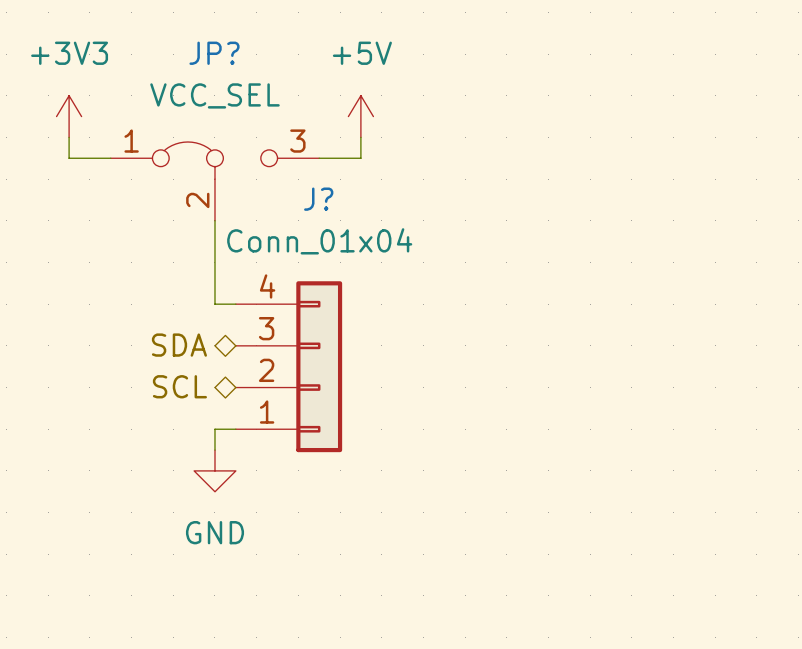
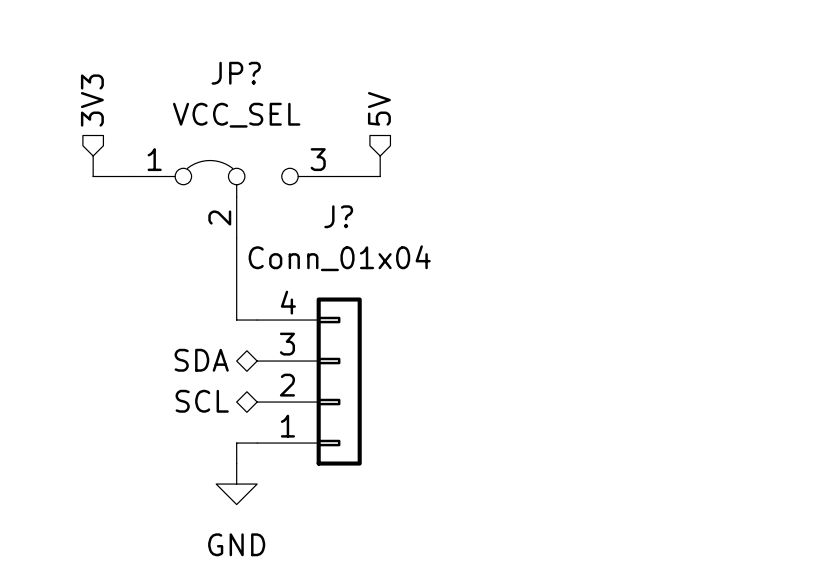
hierarchical label: none -> 3V3 (92, 100)
hierarchical label: none -> 5V (379, 108)
power symbol: +3V3 (69, 116) -> none
power symbol: +5V (360, 116) -> none

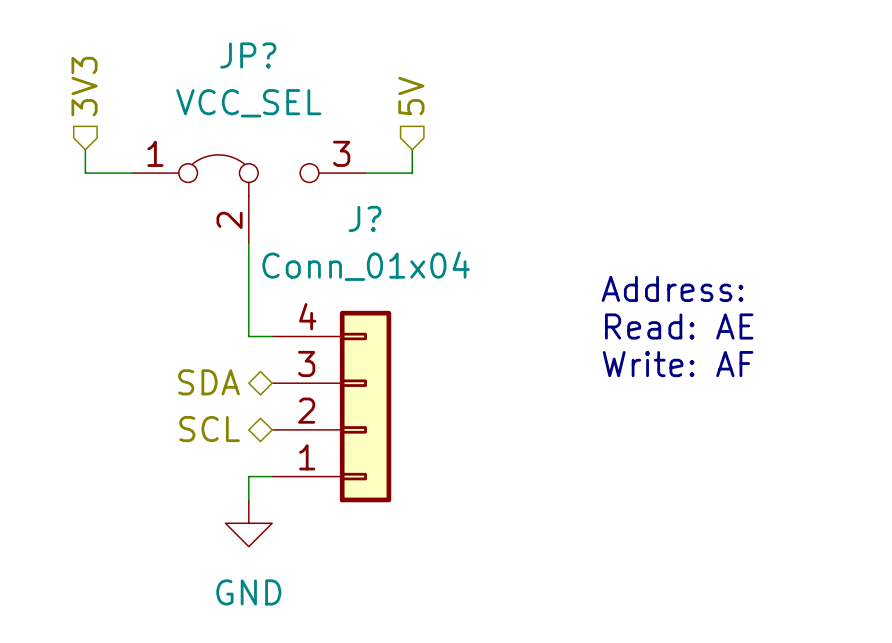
text: none -> Address: (672, 288)
text: none -> Read: AE (679, 326)
text: none -> Write: AF (678, 364)

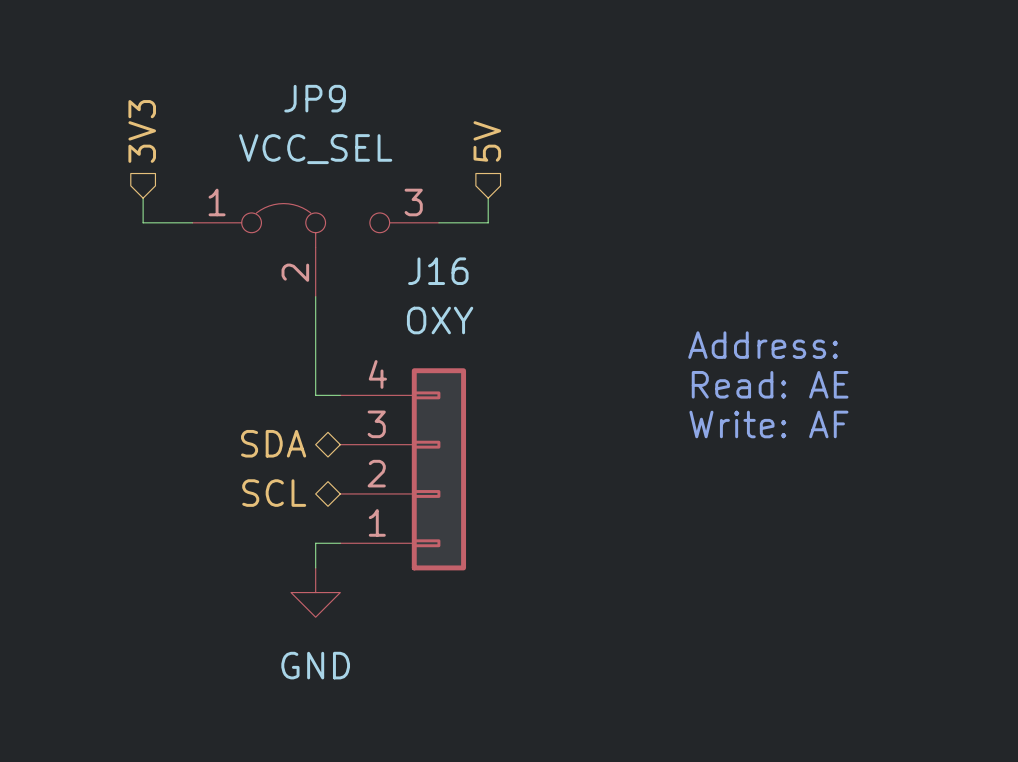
JP? name: JP? (248, 55) -> JP9 (315, 98)
J? name: J? (364, 218) -> J16 (438, 271)
J? value: Conn_01x04 (366, 266) -> OXY (440, 320)

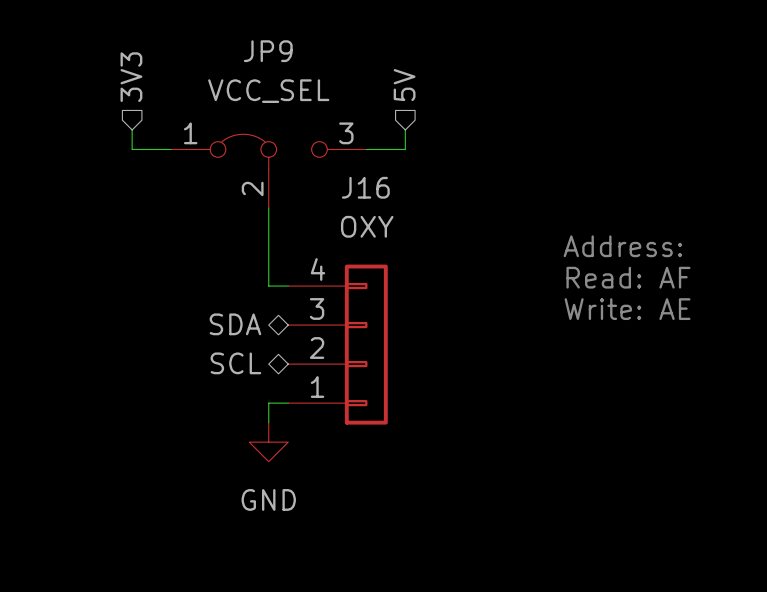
text: Read: AE (770, 384) -> Read: AF (628, 277)
text: Write: AF (768, 424) -> Write: AE (627, 309)

